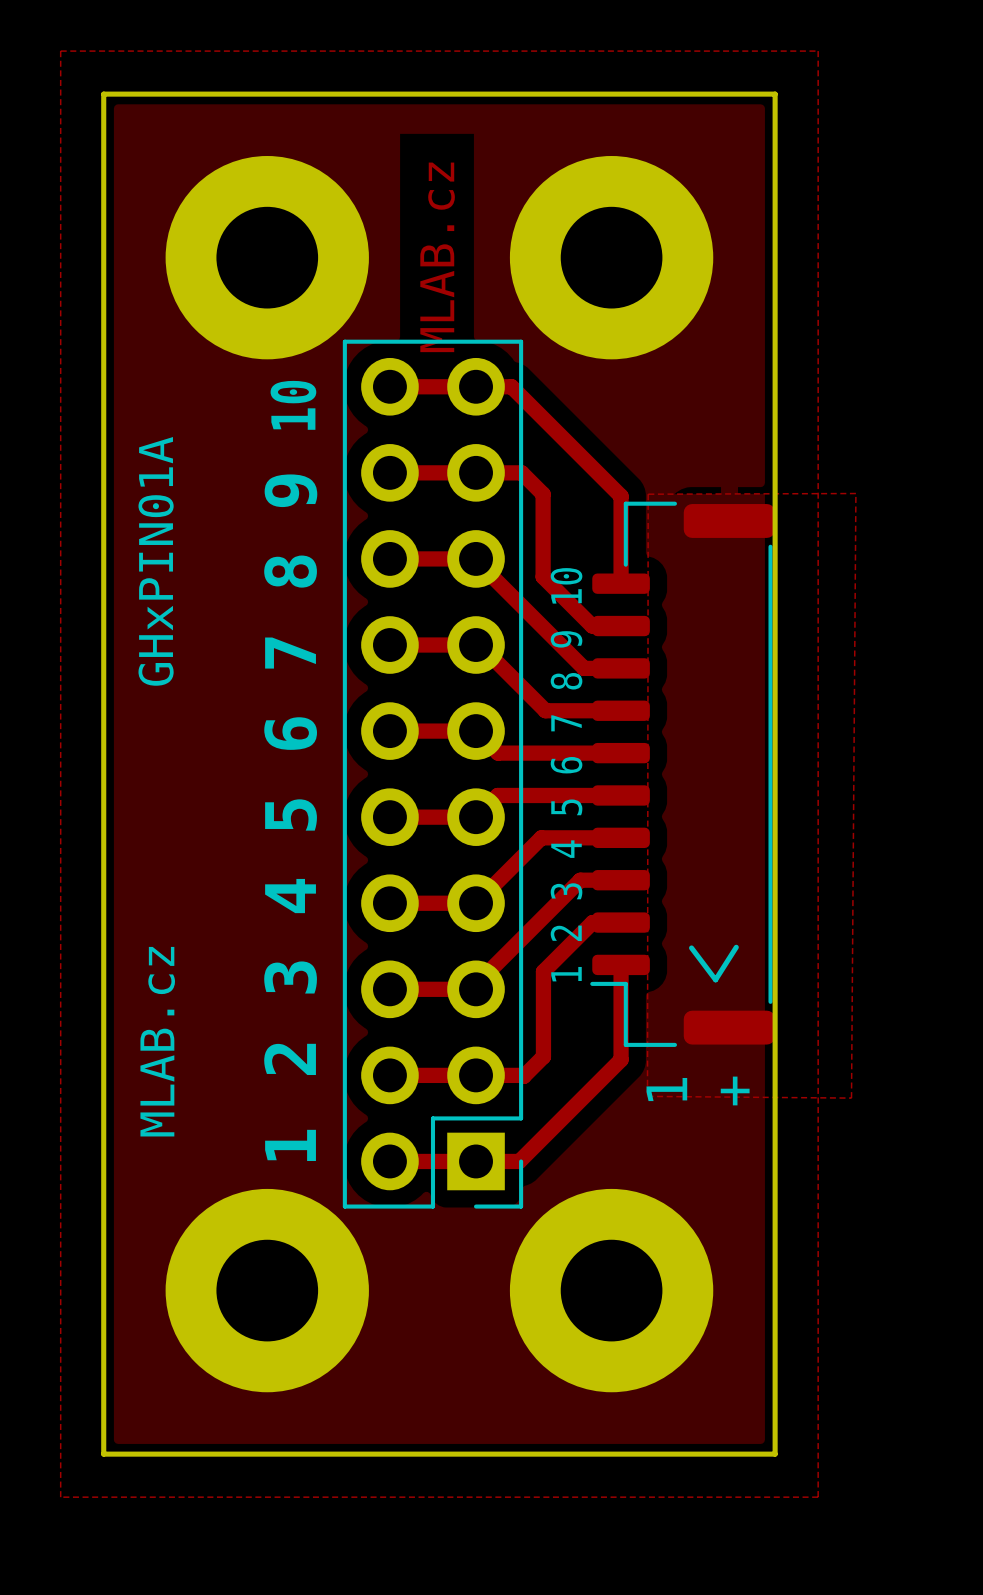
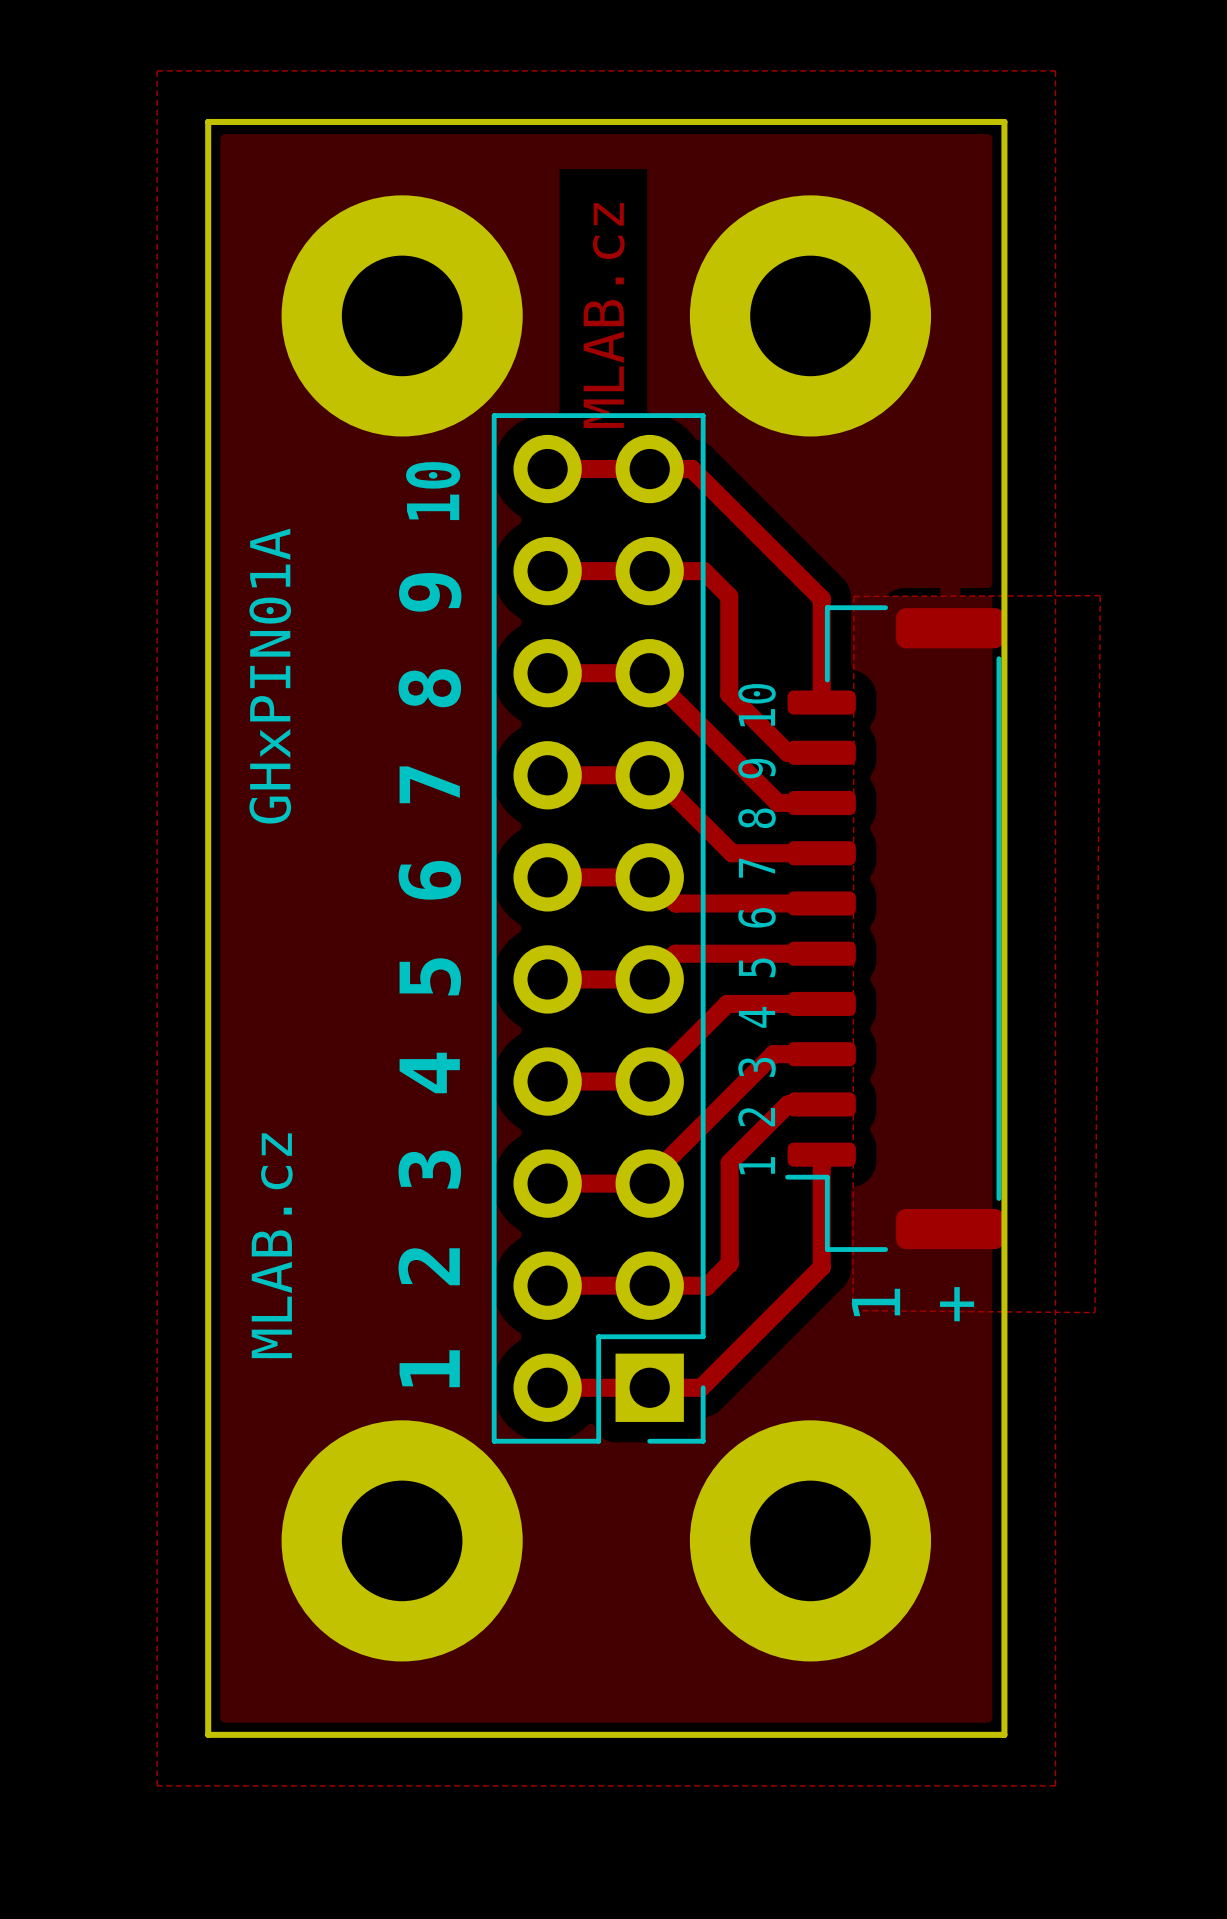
line: (736, 947) (715, 979) (691, 947) -> none

